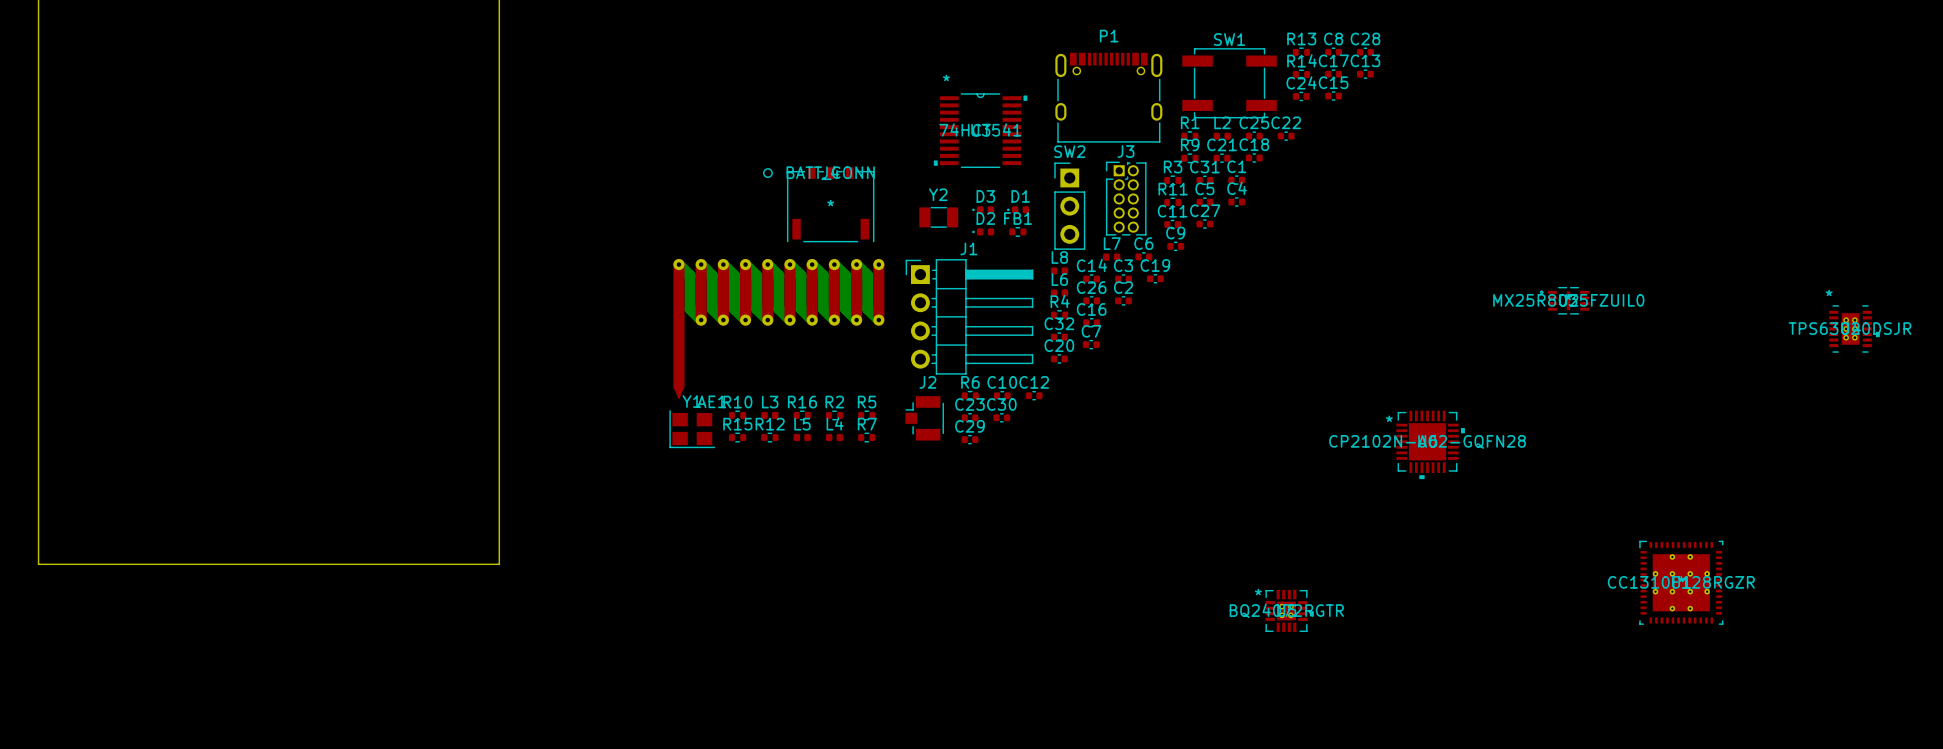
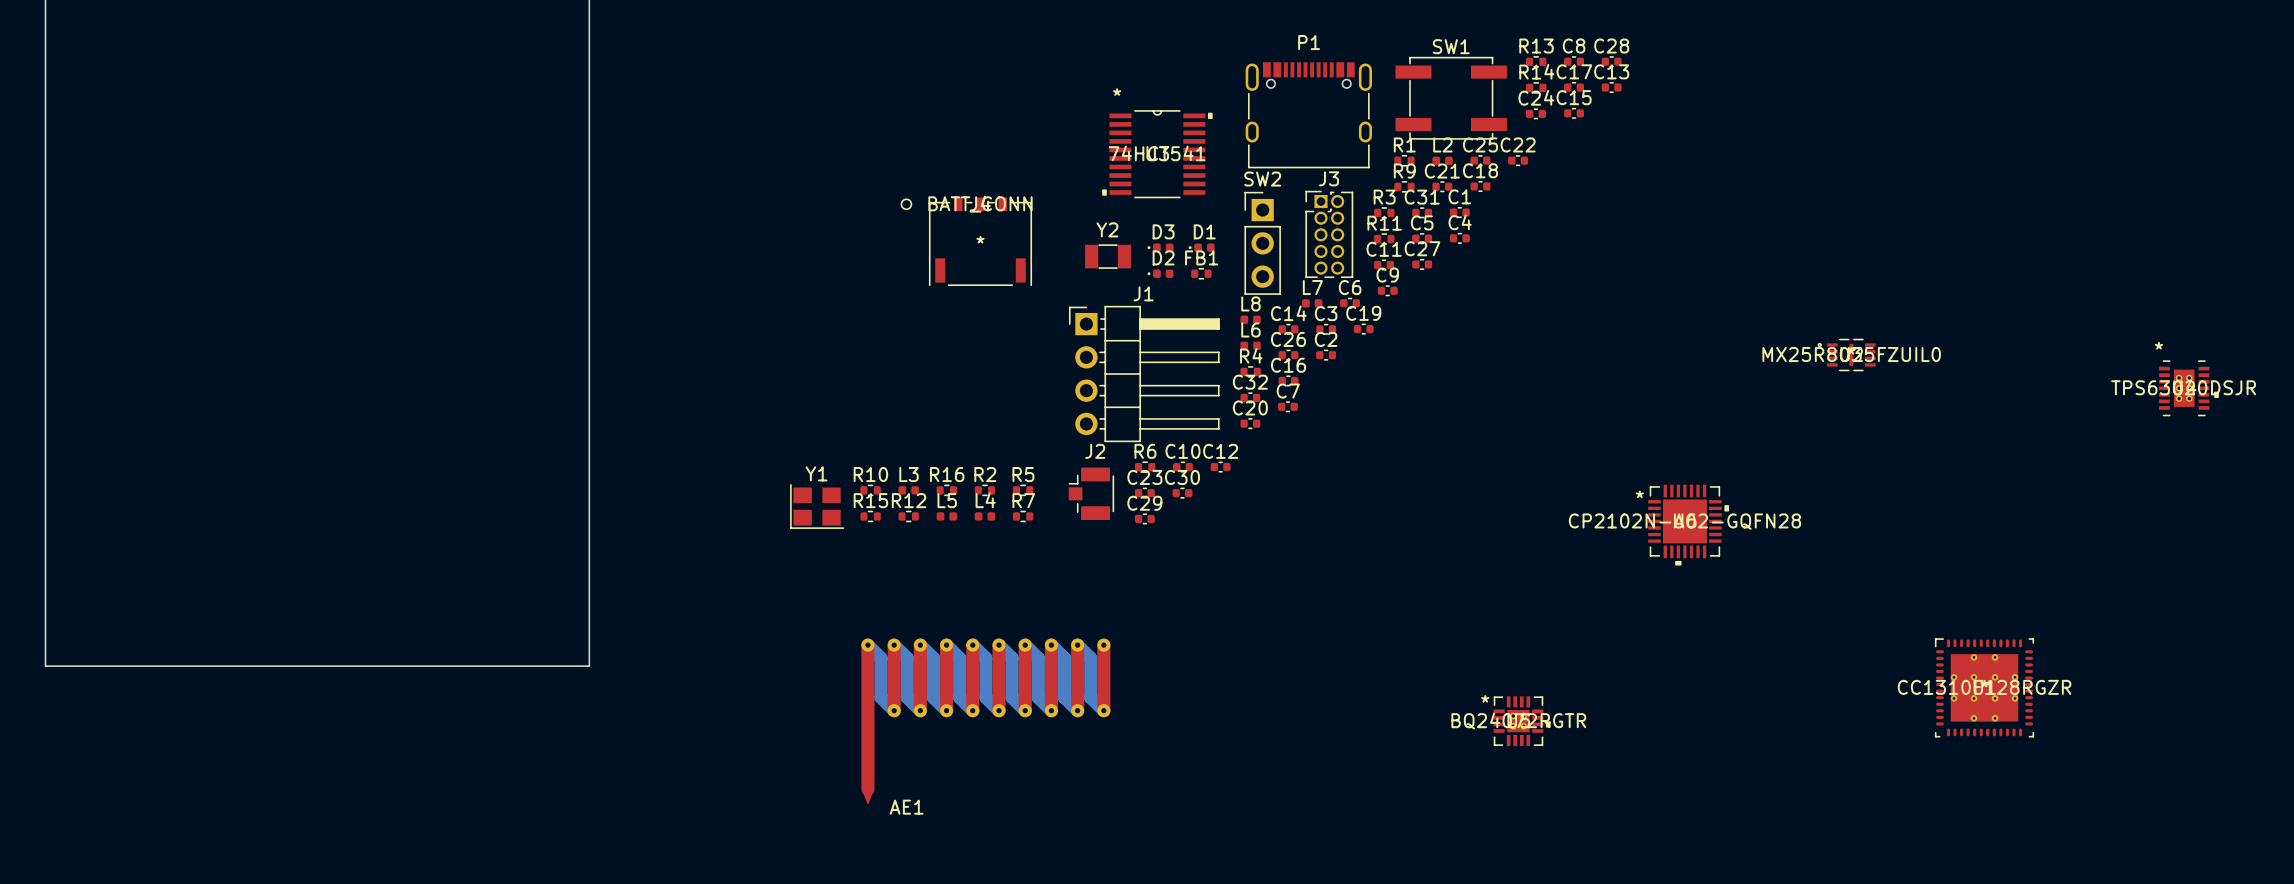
AE1 position: (778, 328) -> (985, 721)

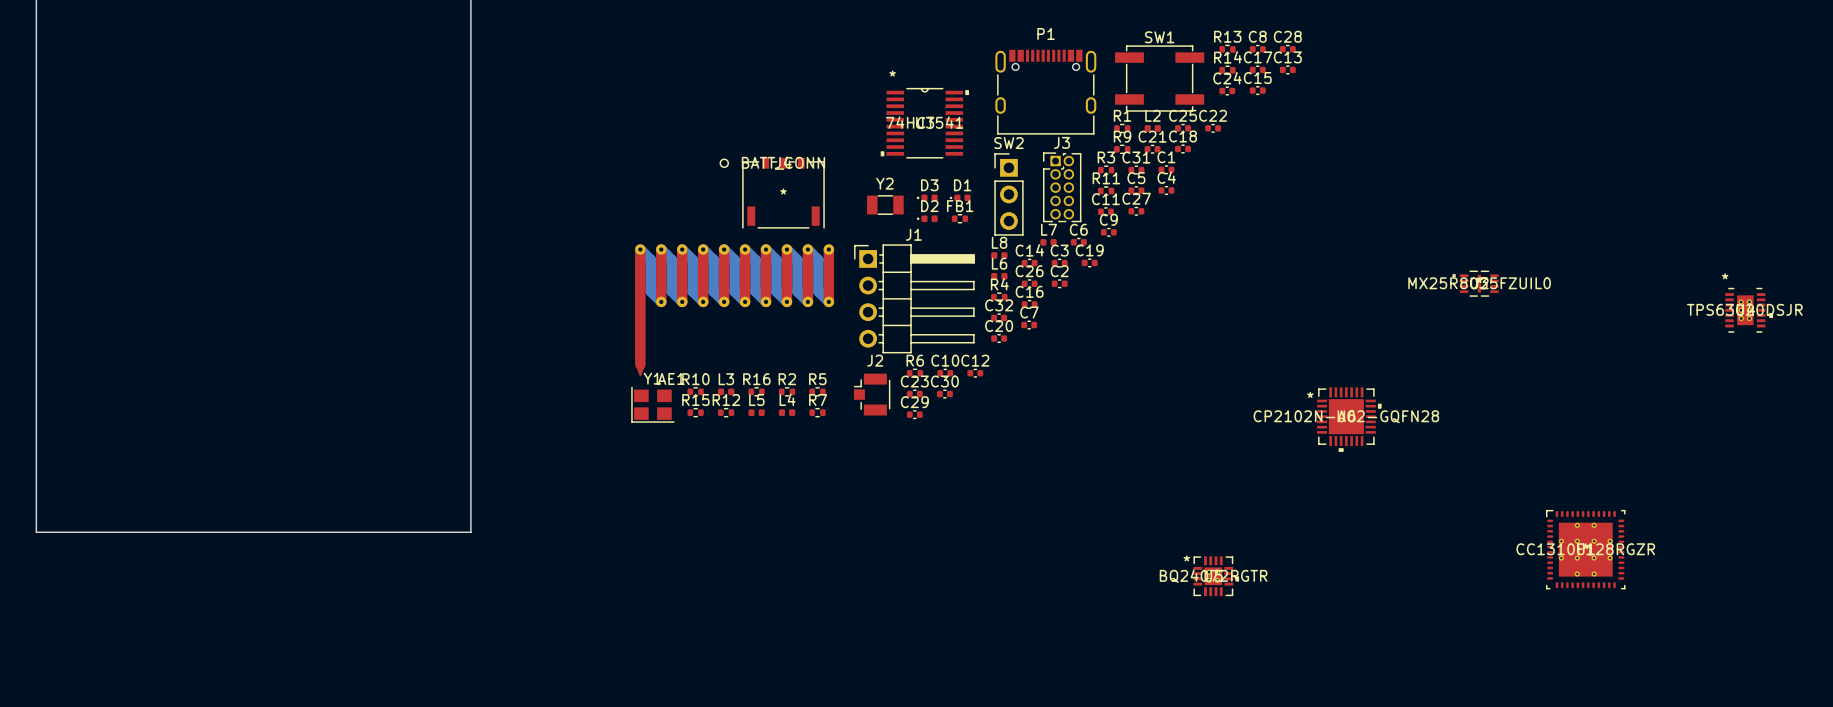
AE1 position: (985, 721) -> (734, 310)

